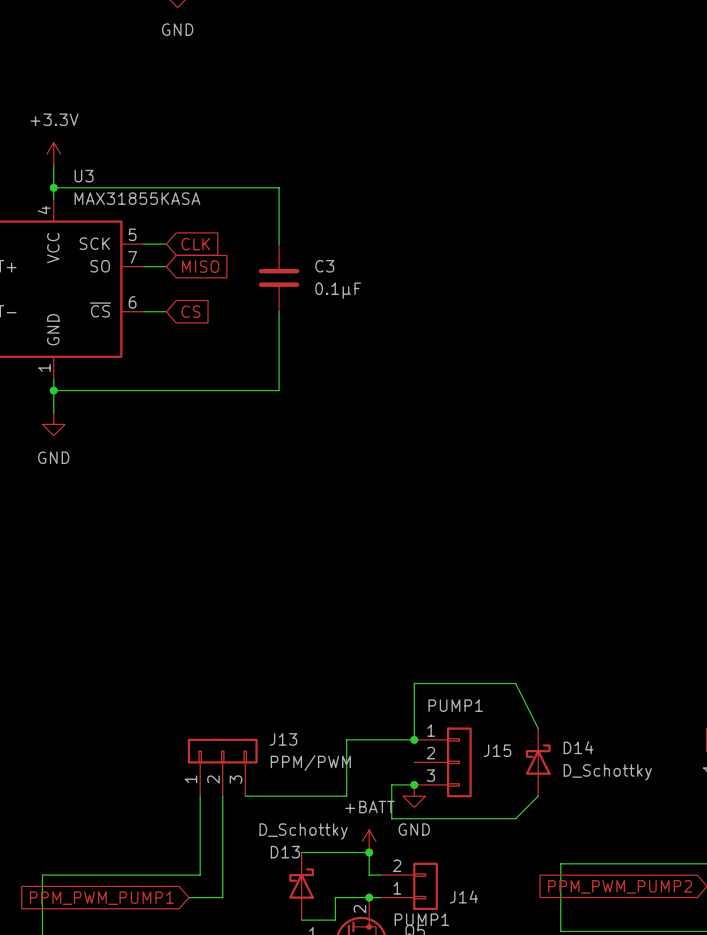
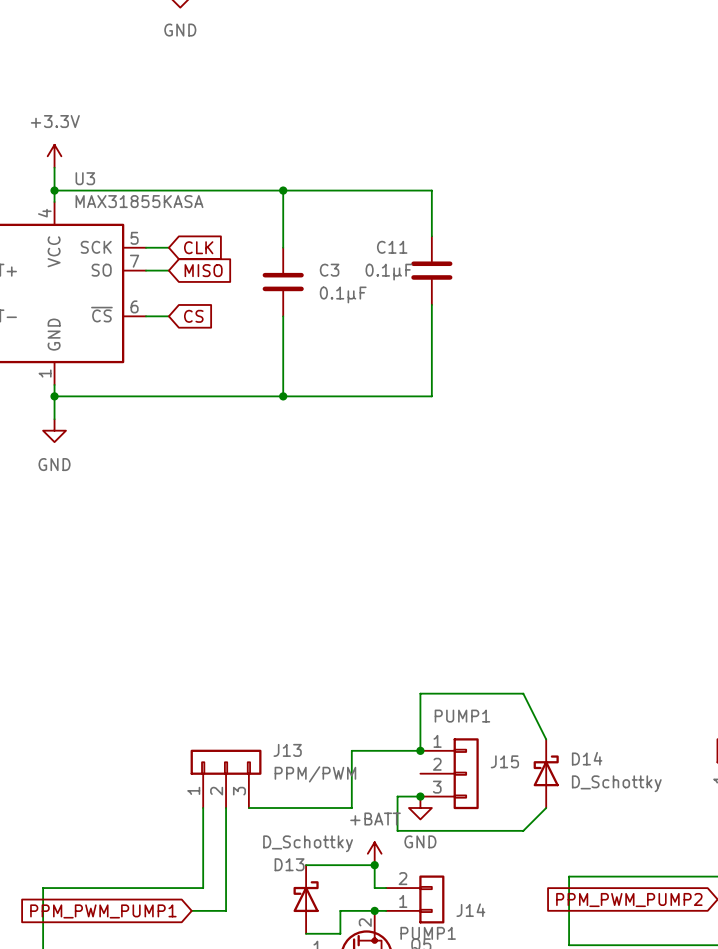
wire: none -> (283, 190) (431, 190) (431, 236)
junction: none -> (283, 190)
C11: none -> 0.1µF (431, 270)
wire: none -> (431, 304) (431, 396) (283, 396)
junction: none -> (283, 396)

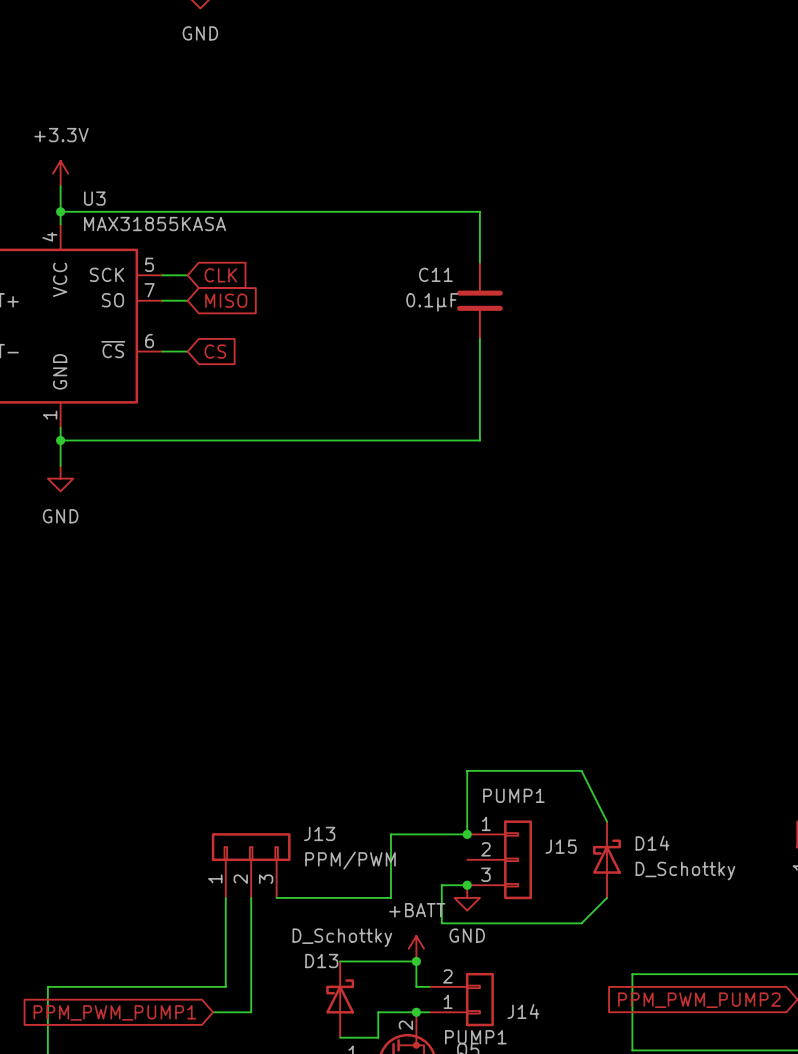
wire: (283, 190) (283, 247) -> none
junction: (283, 190) -> none
C3: 0.1µF (283, 282) -> none
wire: (283, 316) (283, 396) -> none
junction: (283, 396) -> none

